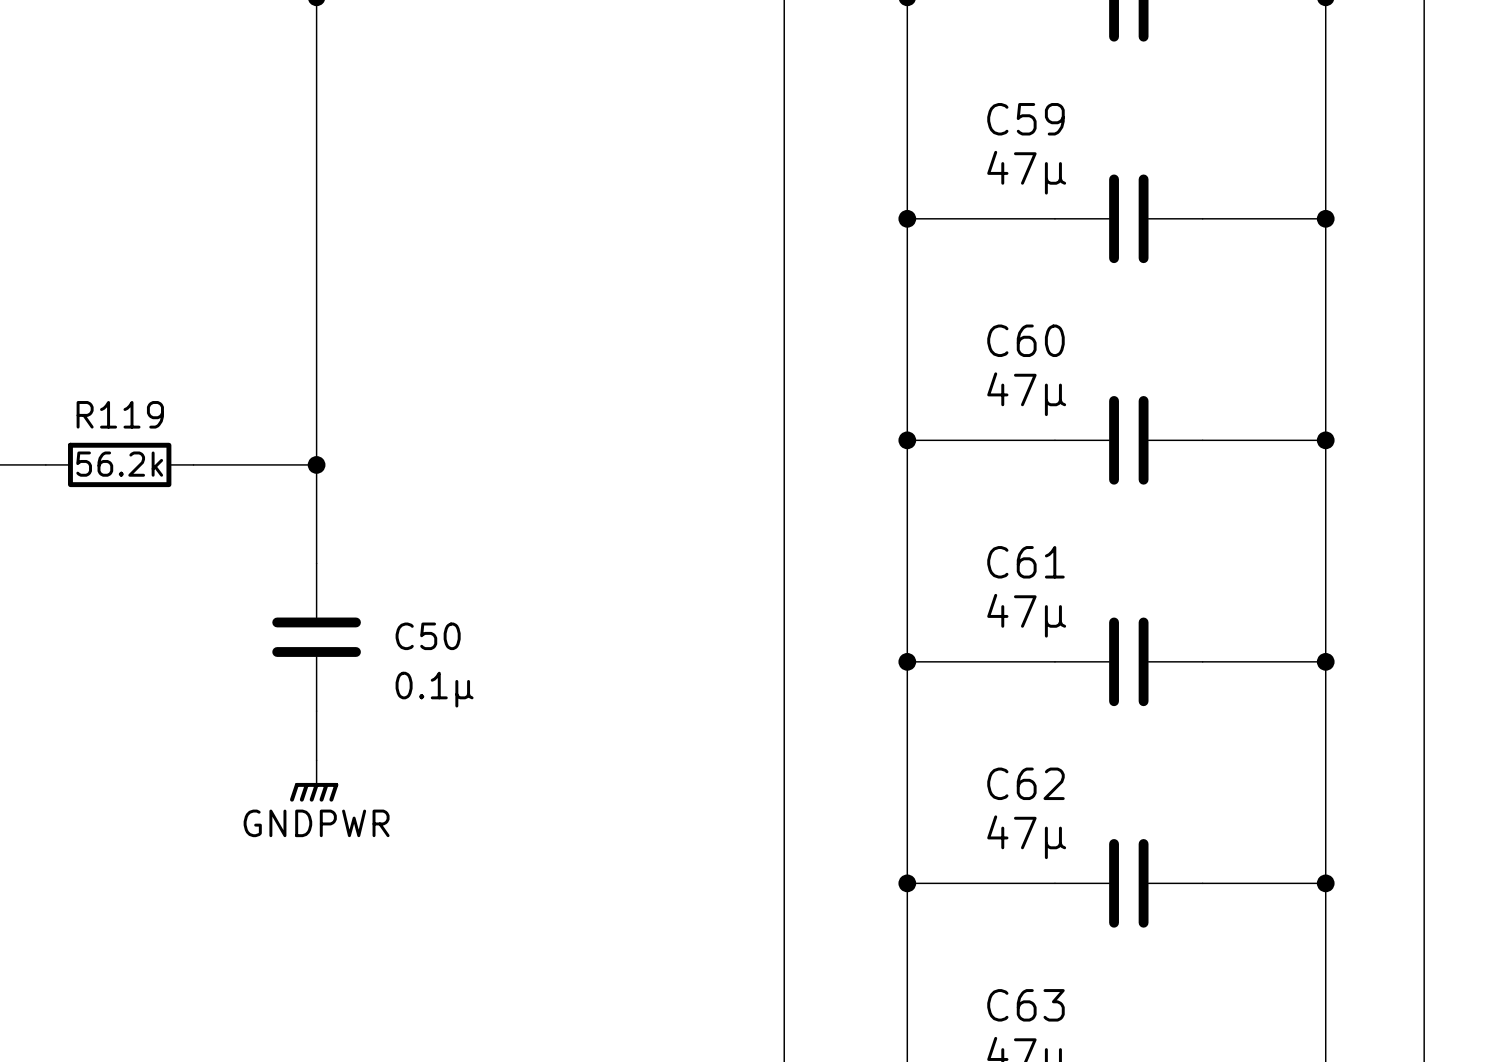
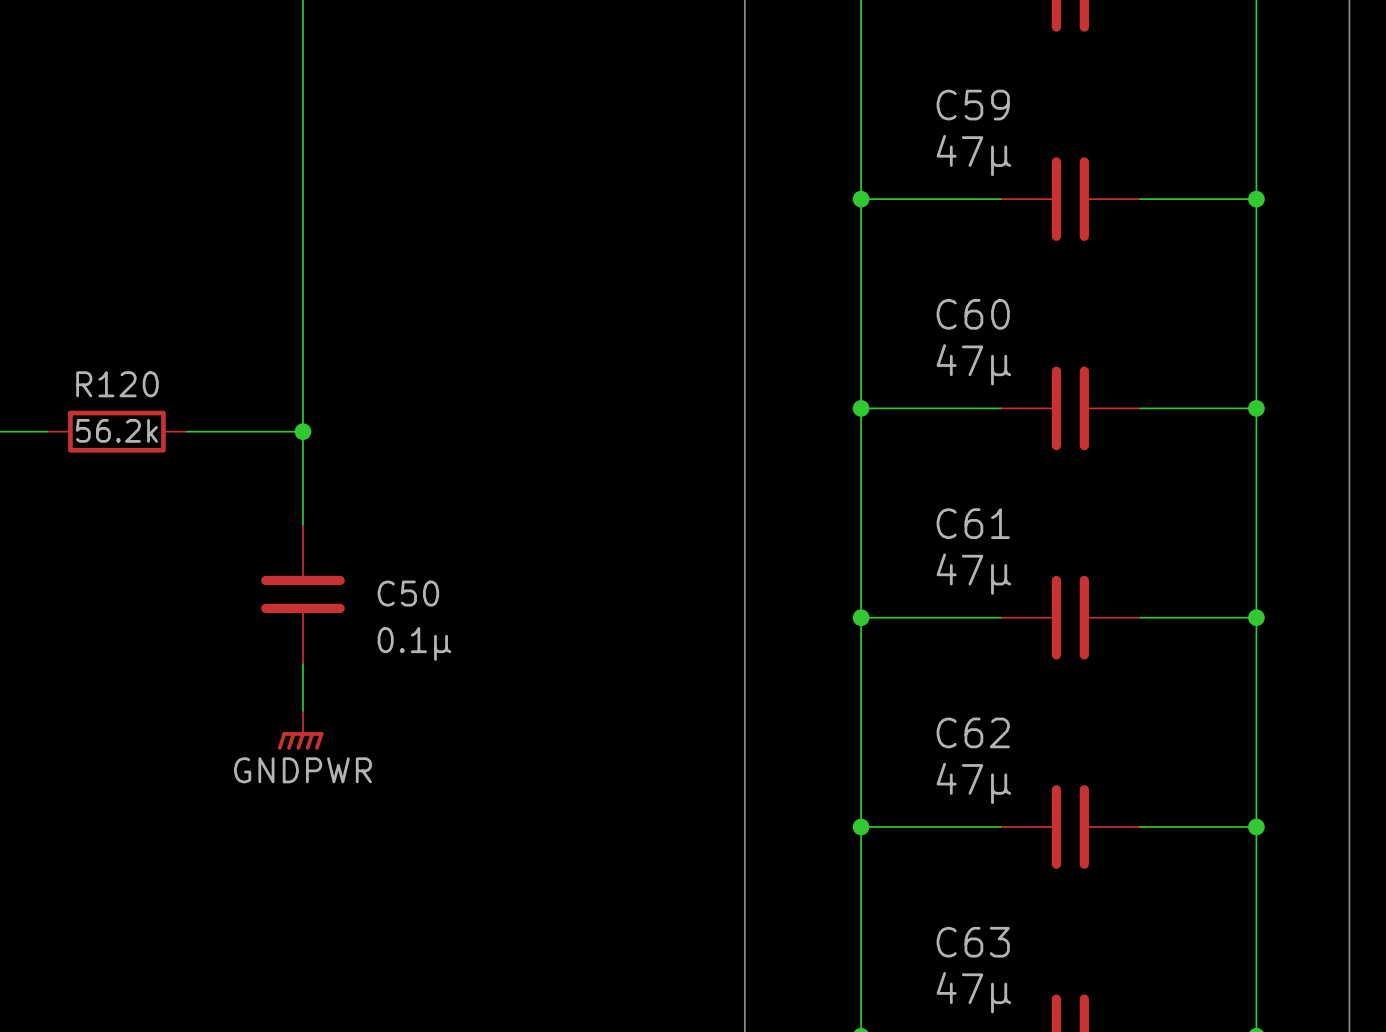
R119 name: R119 (120, 414) -> R120 (117, 384)

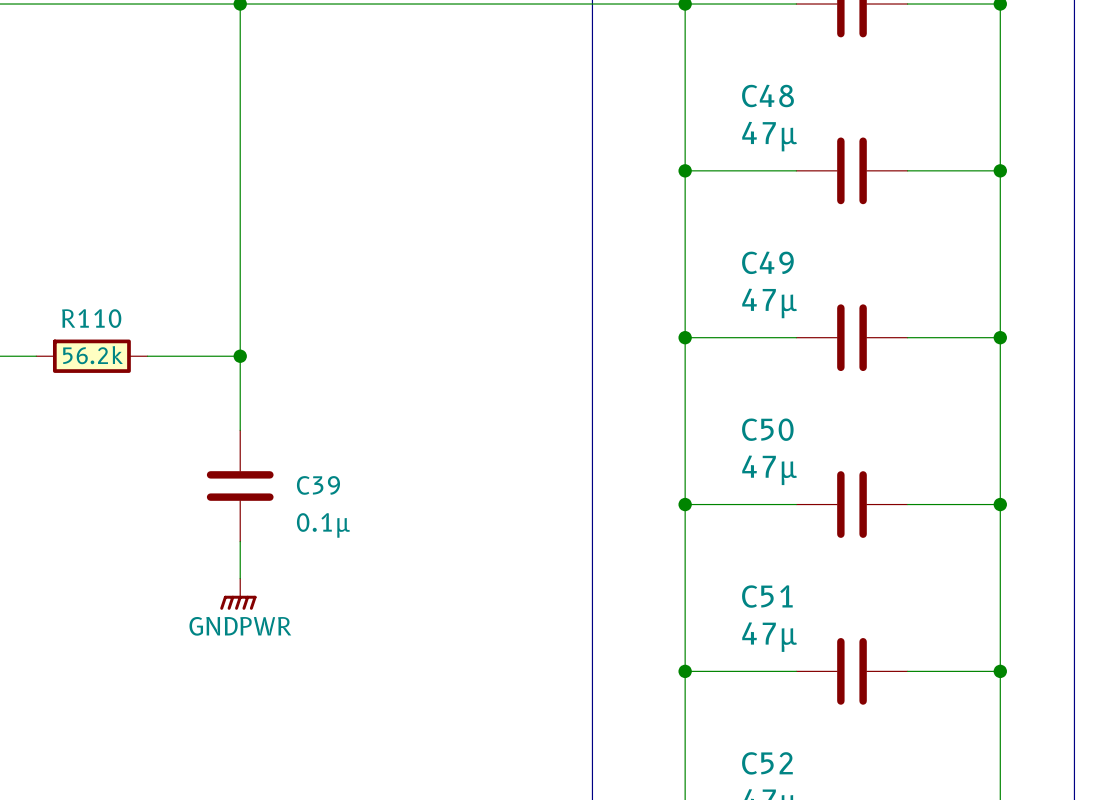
C59 name: C59 (973, 105) -> C48 (767, 95)
C60 name: C60 (973, 314) -> C49 (767, 262)
R120 name: R120 (117, 384) -> R110 (91, 318)
C61 name: C61 (973, 523) -> C50 (767, 429)
C50 name: C50 (408, 593) -> C39 (318, 485)
C62 name: C62 (973, 732) -> C51 (767, 596)
C63 name: C63 (973, 942) -> C52 (767, 763)

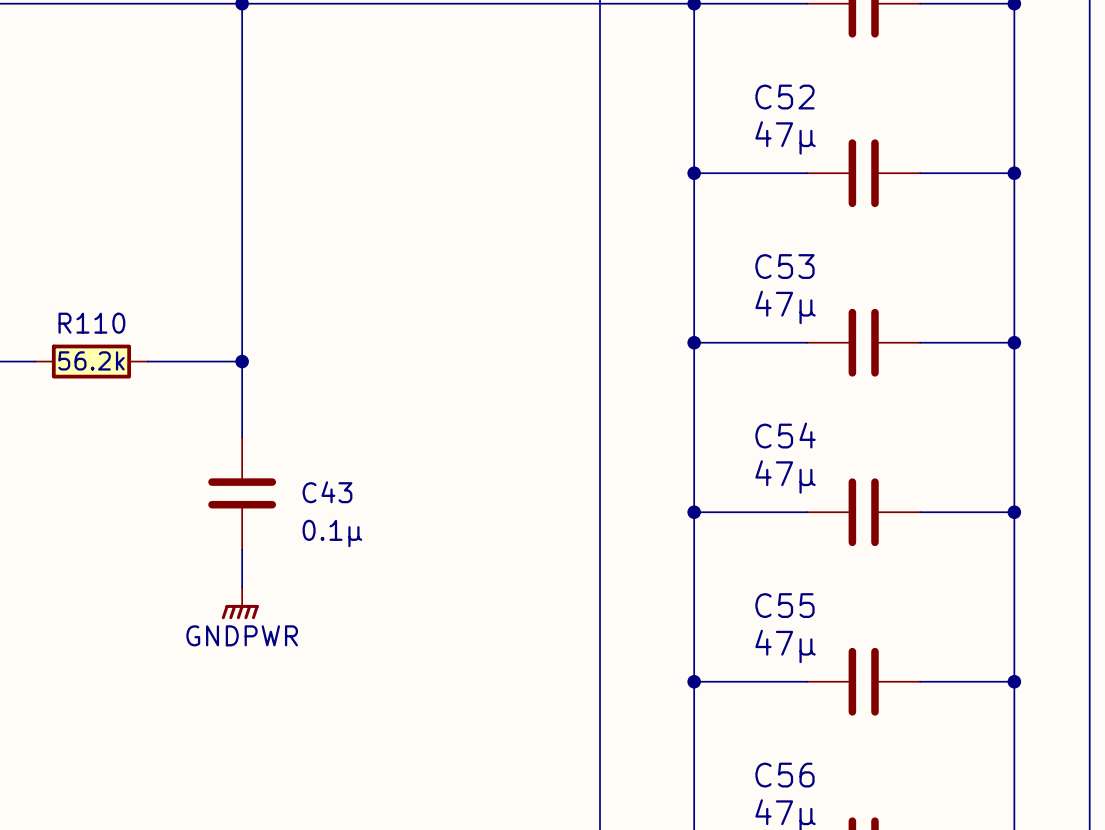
C48 name: C48 (767, 95) -> C52 (784, 97)
C49 name: C49 (767, 262) -> C53 (784, 266)
C50 name: C50 (767, 429) -> C54 (785, 435)
C39 name: C39 (318, 485) -> C43 (327, 492)
C51 name: C51 (767, 596) -> C55 (784, 605)
C52 name: C52 (767, 763) -> C56 (784, 775)

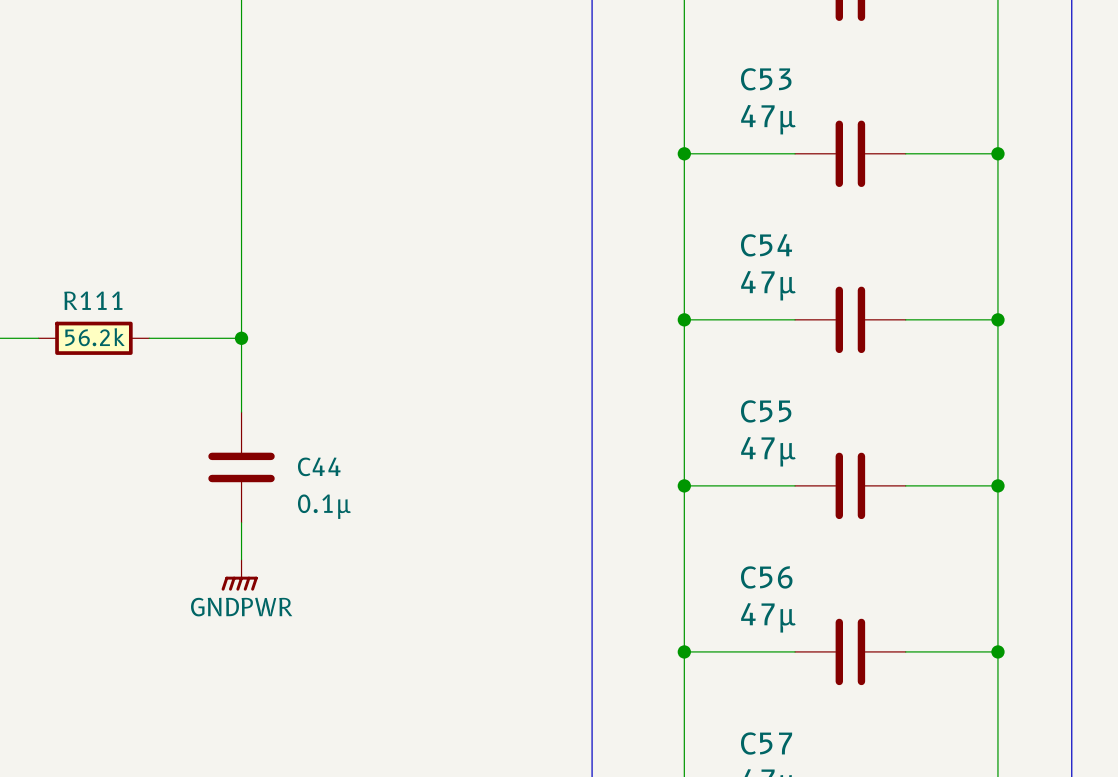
C52 name: C52 (784, 97) -> C53 (766, 79)
C53 name: C53 (784, 266) -> C54 (766, 245)
R110 name: R110 (91, 323) -> R111 (93, 300)
C54 name: C54 (785, 435) -> C55 (766, 411)
C43 name: C43 (327, 492) -> C44 (319, 466)
C55 name: C55 (784, 605) -> C56 (766, 577)
C56 name: C56 (784, 775) -> C57 (766, 743)

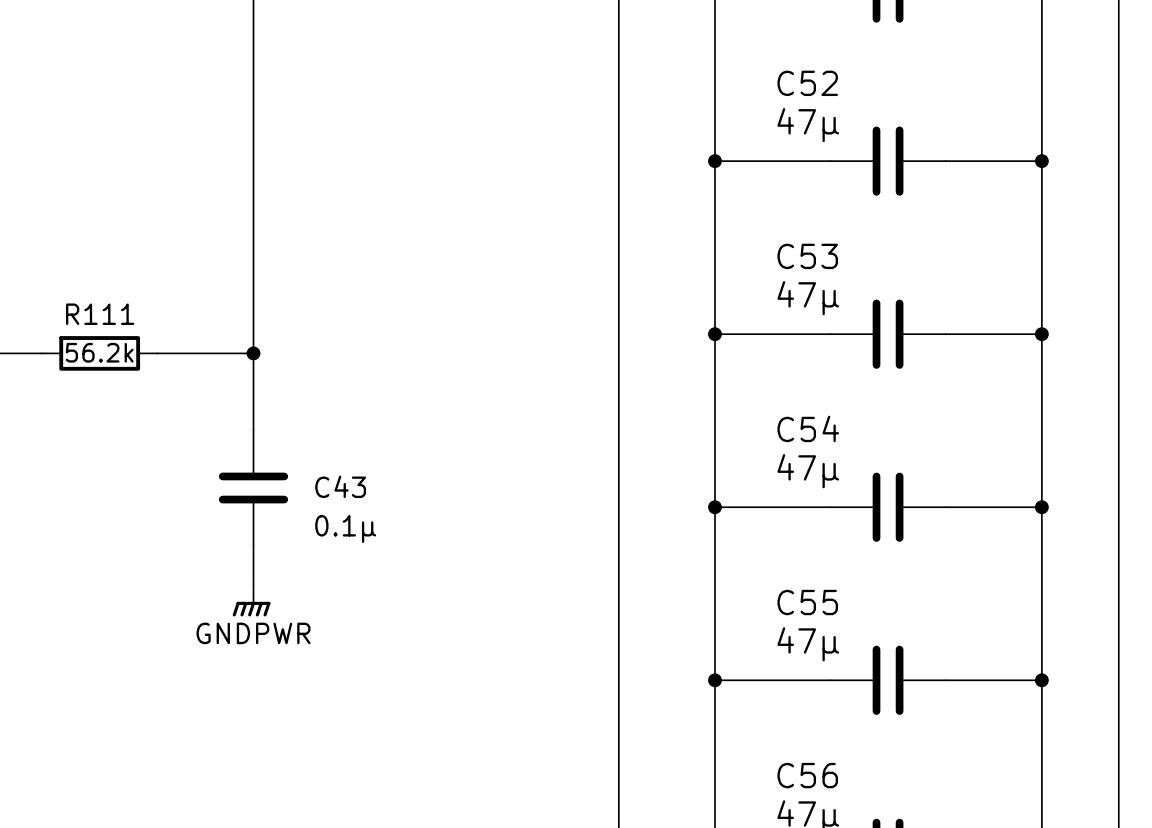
C53 name: C53 (766, 79) -> C52 (807, 83)
C54 name: C54 (766, 245) -> C53 (807, 256)
C55 name: C55 (766, 411) -> C54 (808, 428)
C44 name: C44 (319, 466) -> C43 (340, 486)
C56 name: C56 (766, 577) -> C55 (807, 602)
C57 name: C57 (766, 743) -> C56 (807, 775)

